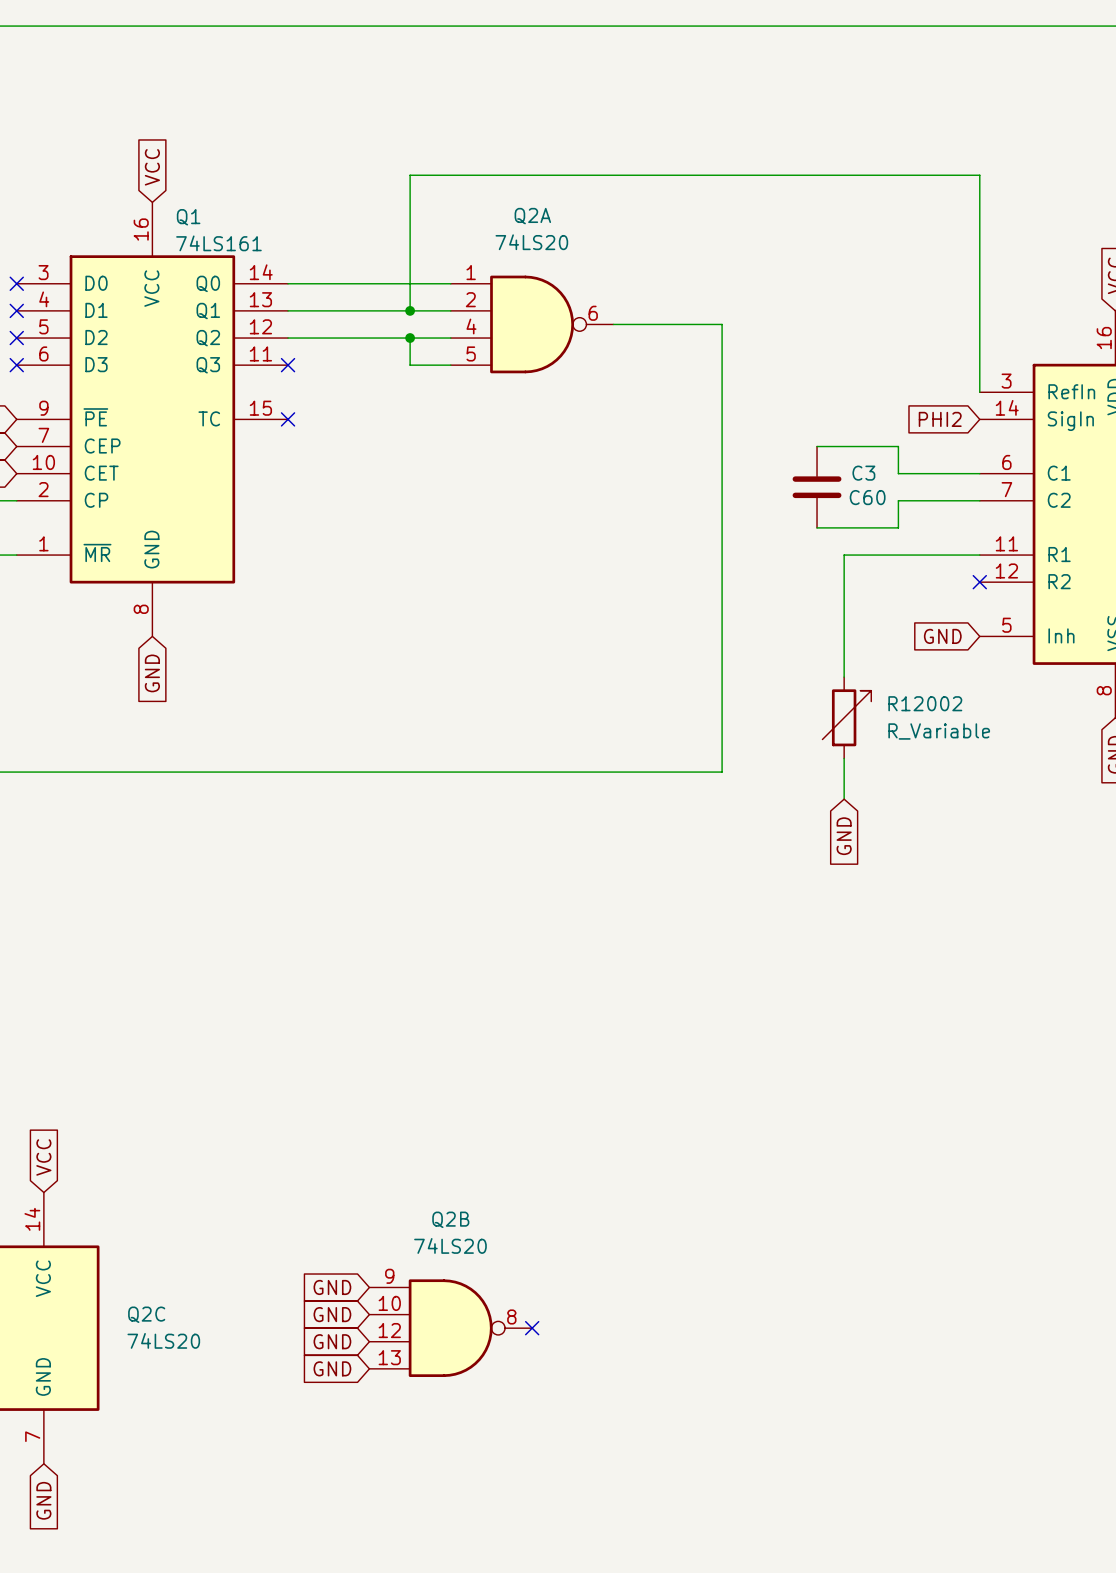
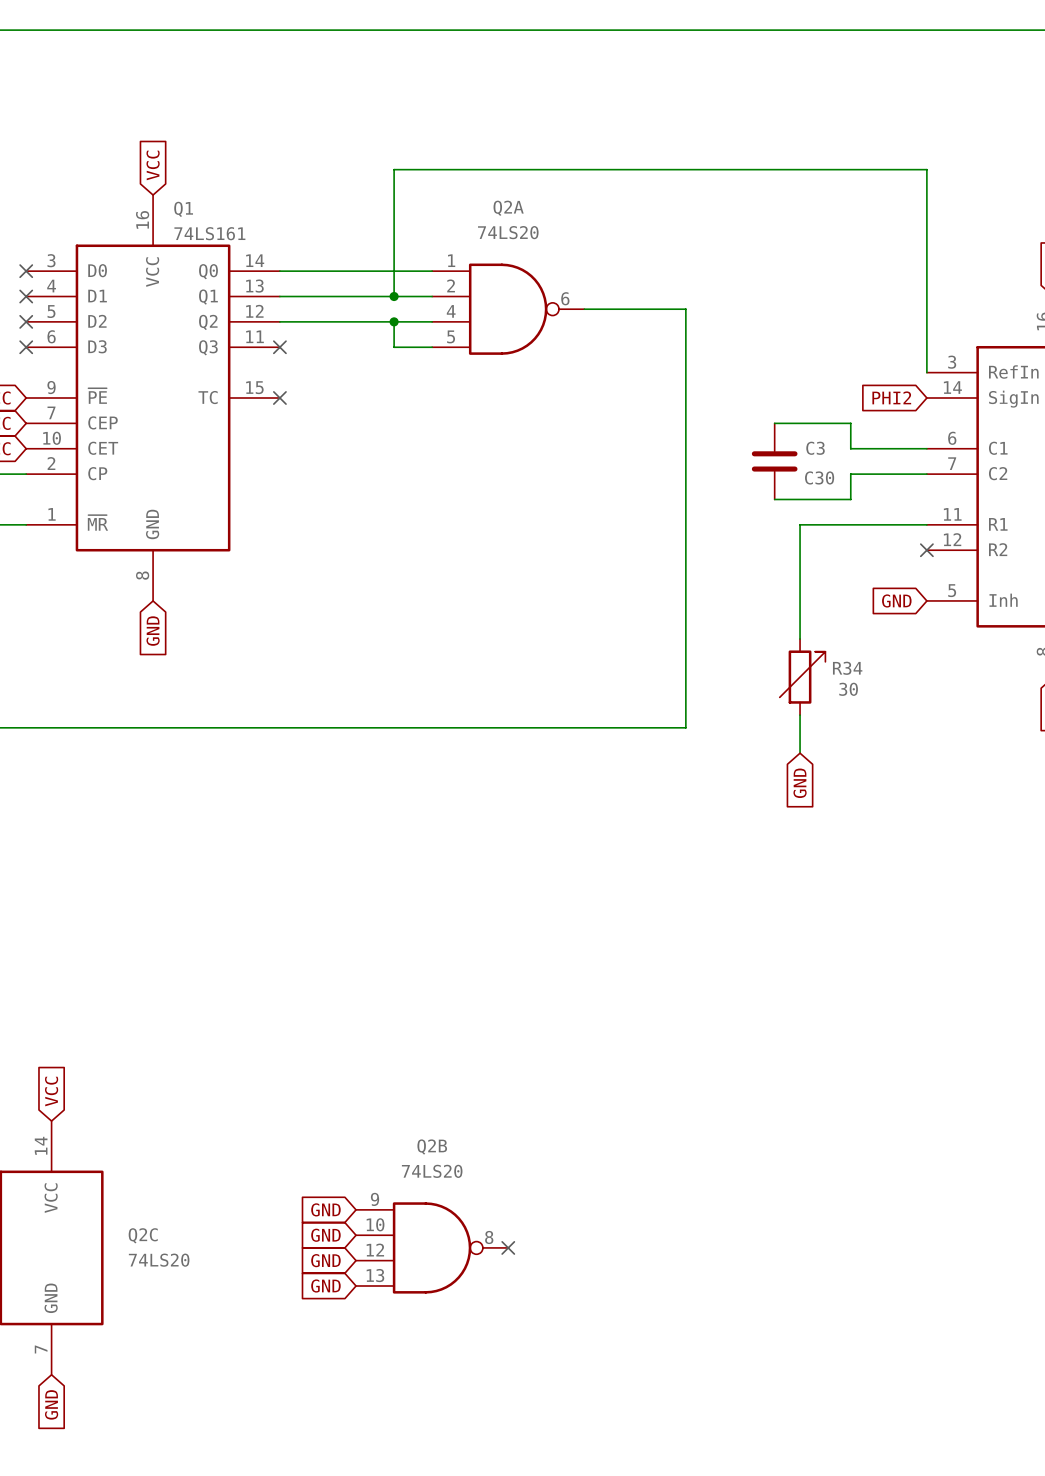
C3 value: C60 (867, 497) -> C30 (819, 477)
R12002 name: R12002 (925, 703) -> R34 (847, 668)
R12002 value: R_Variable (939, 731) -> 30 (848, 689)

